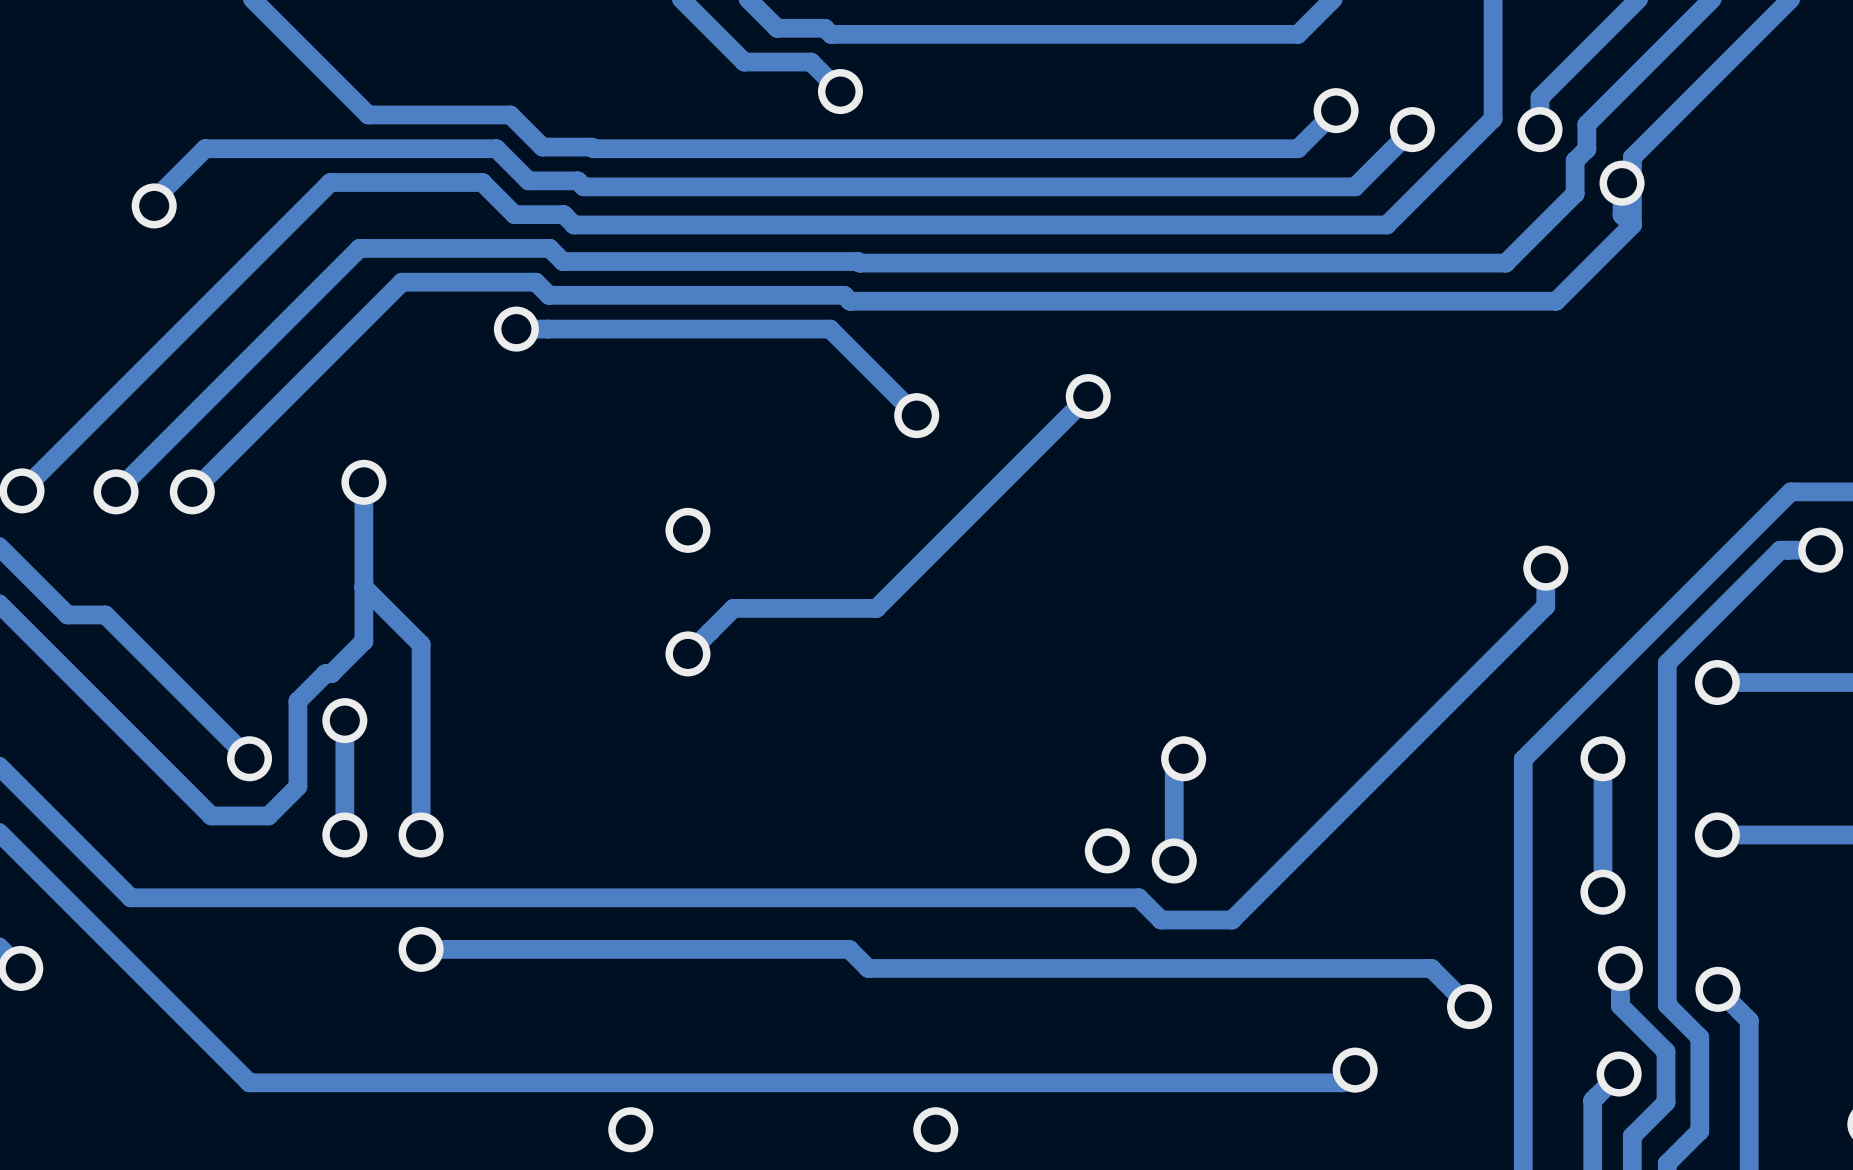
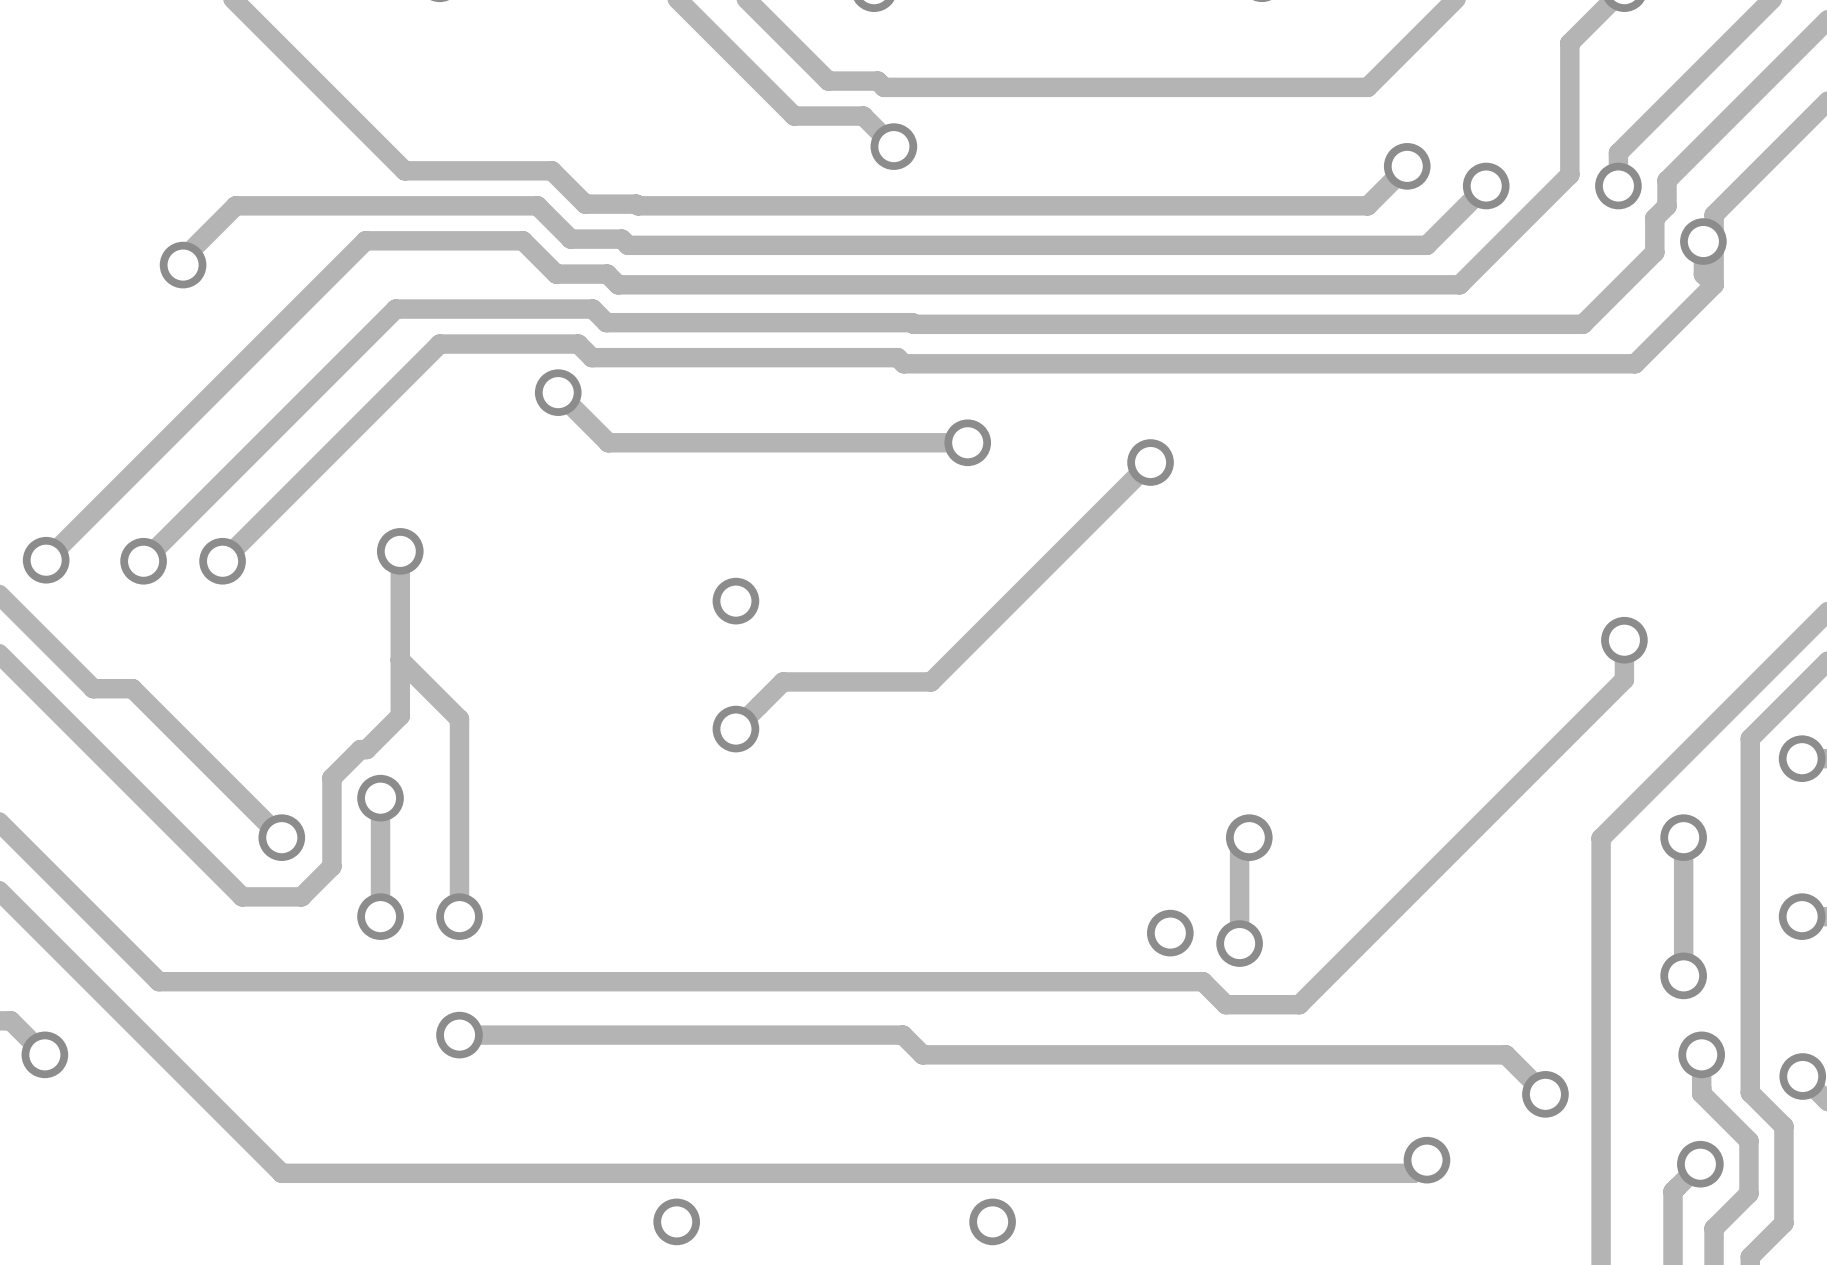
track: (516, 329) (830, 329) (916, 415) -> (558, 392) (608, 442) (967, 442)
via position: (916, 415) -> (967, 442)

